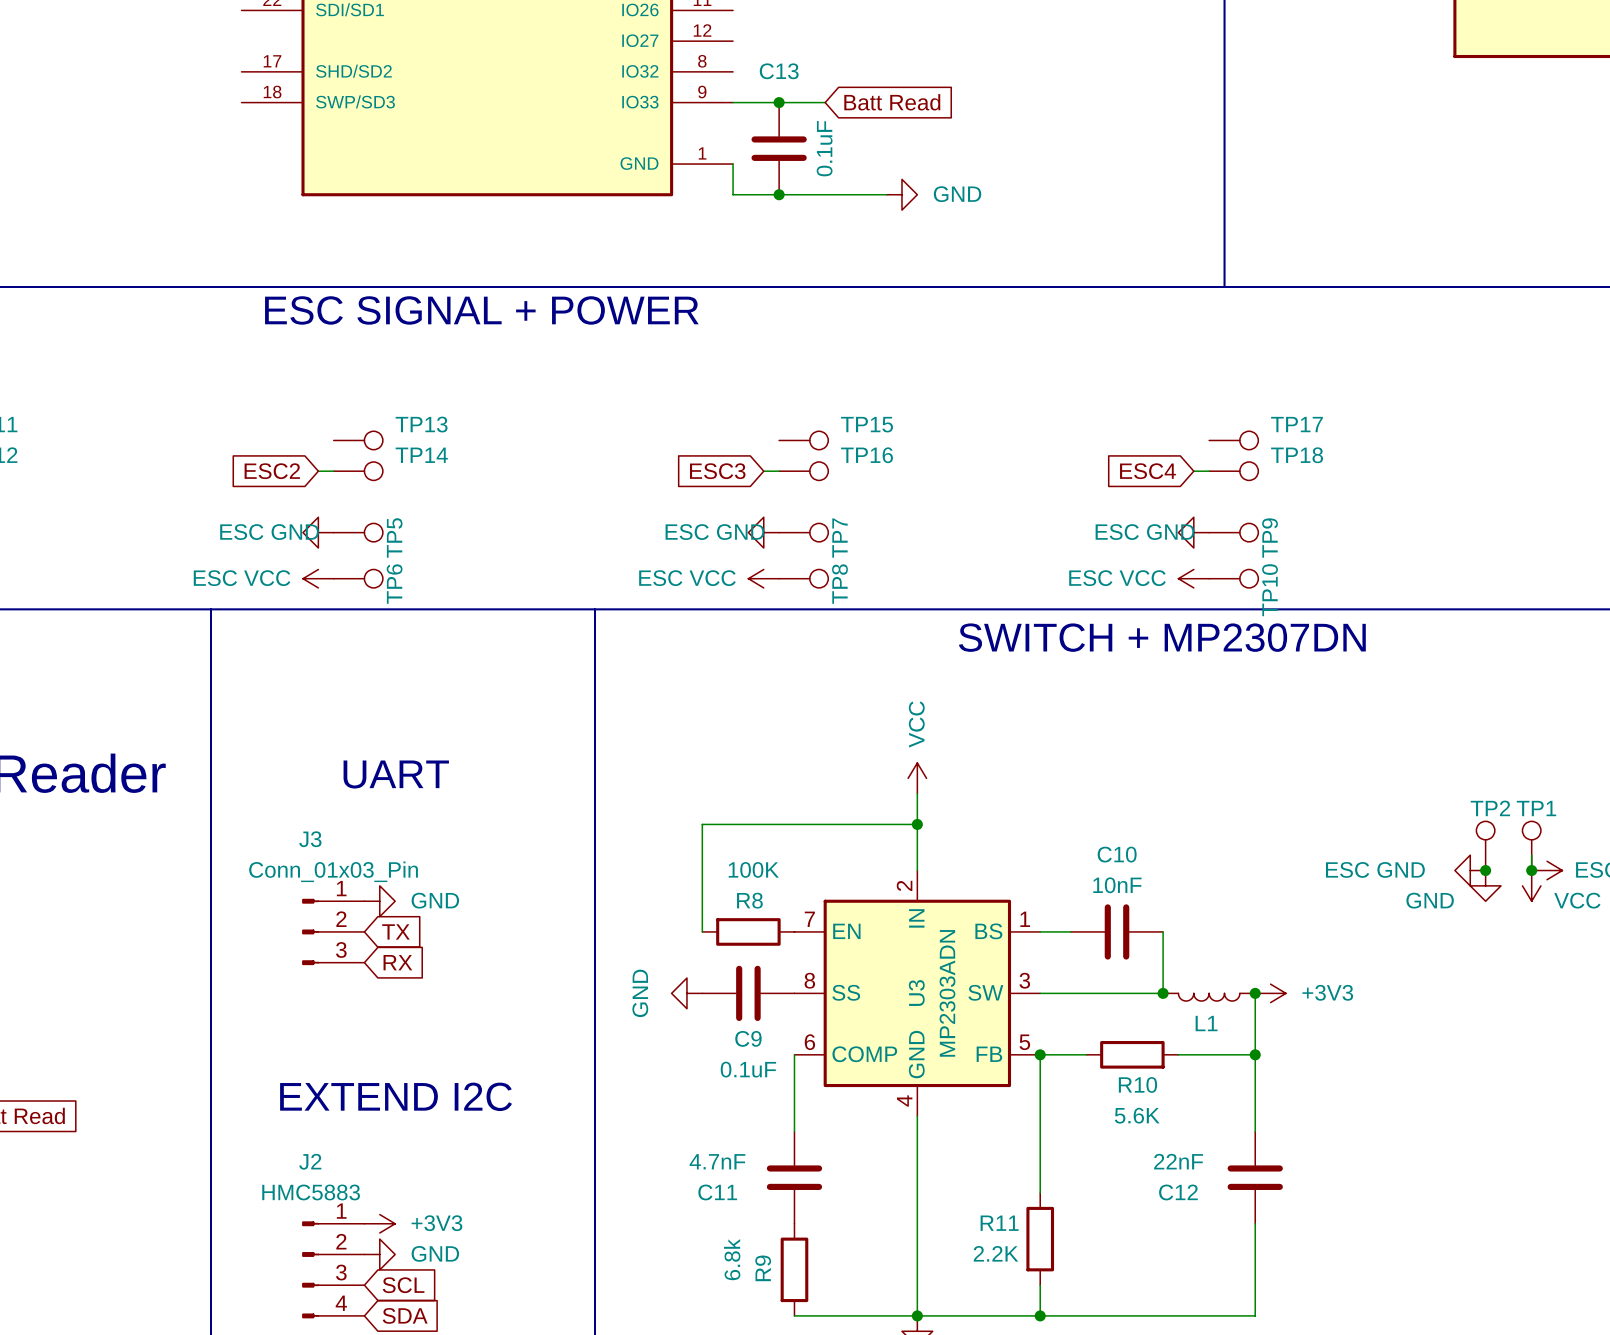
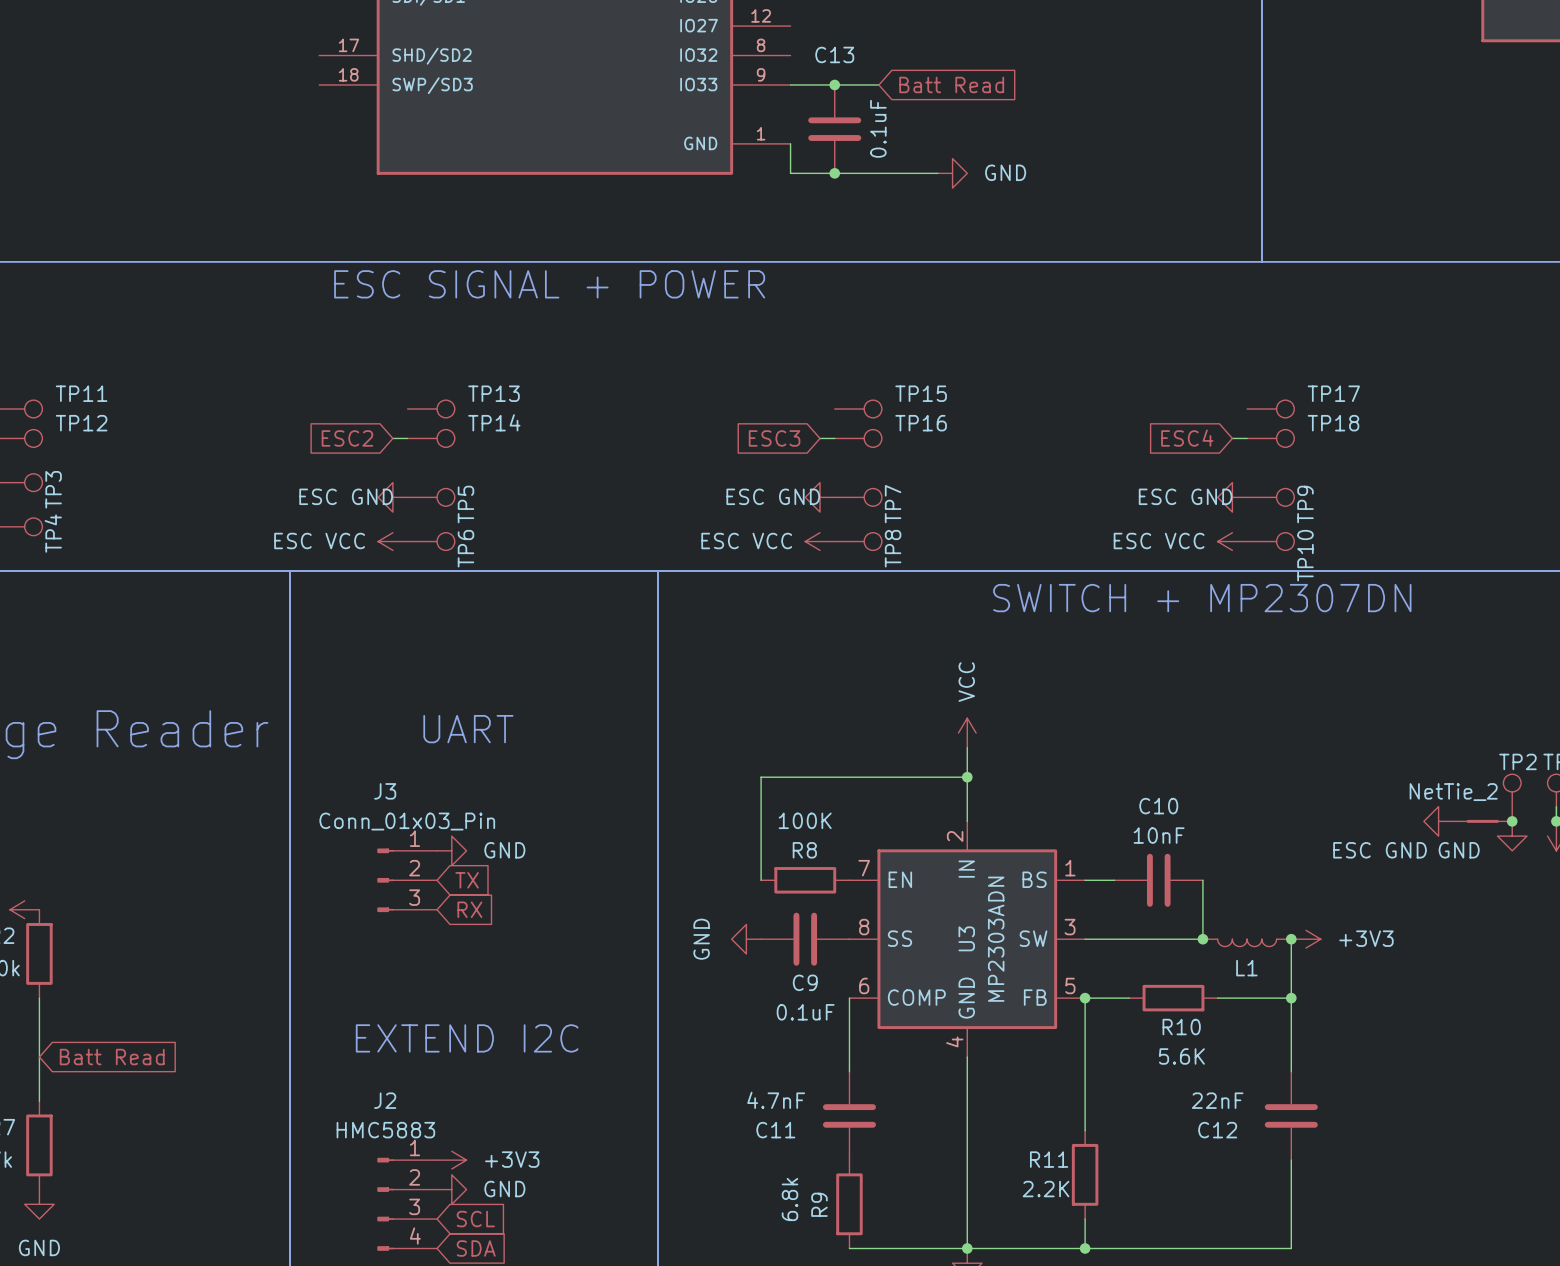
power symbol text position: ESC GND (1375, 869) -> ESC GND (1380, 850)
part: none -> NetTie_2 (1482, 821)
power symbol position: ESC GND (1470, 870) -> ESC GND (1438, 821)

